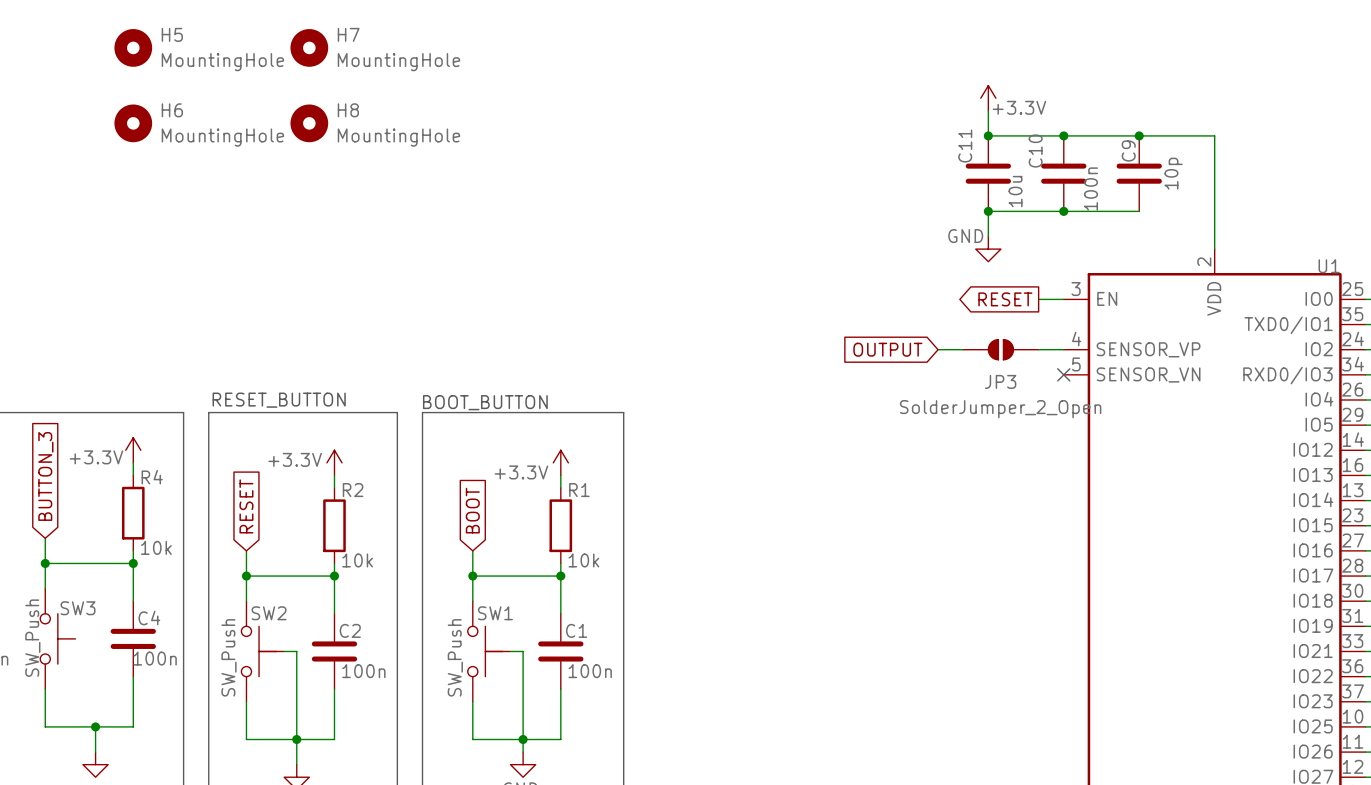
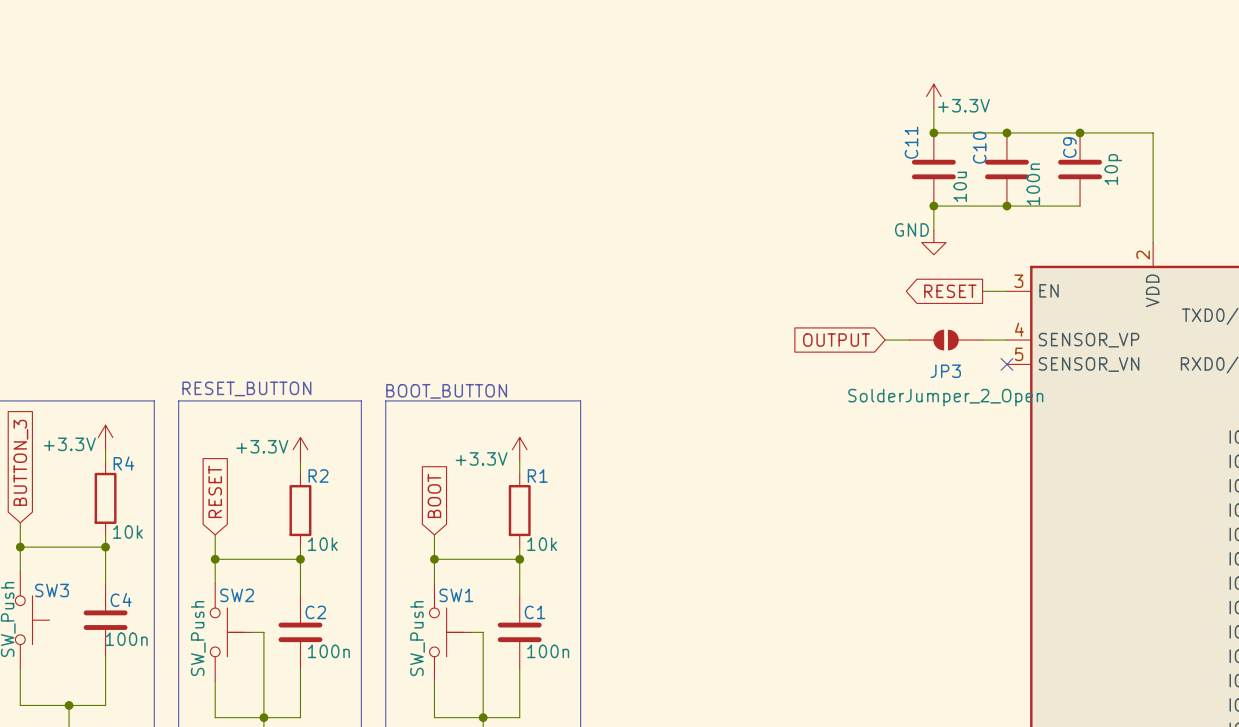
H5: MountingHole (133, 47) -> none
H7: MountingHole (309, 47) -> none
H6: MountingHole (133, 123) -> none
H8: MountingHole (309, 123) -> none

